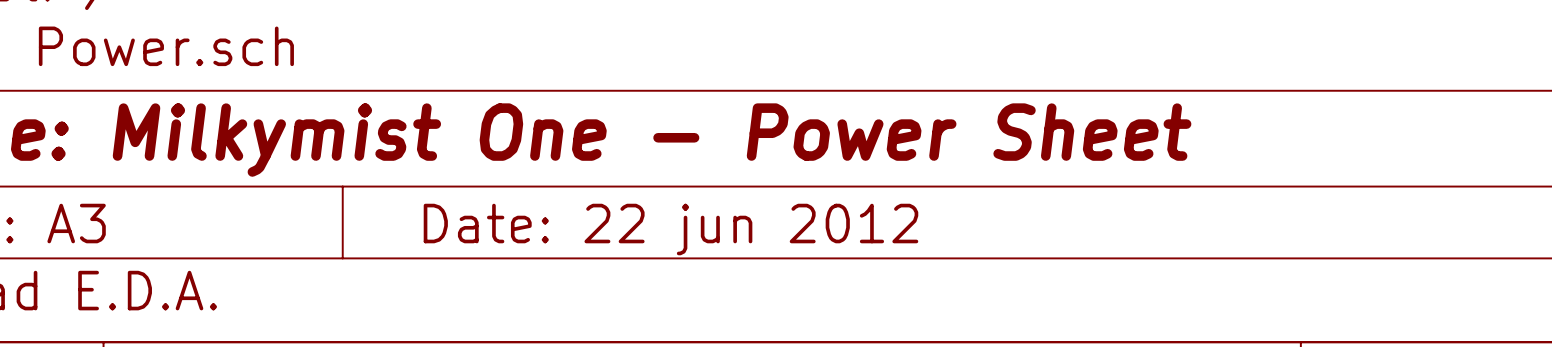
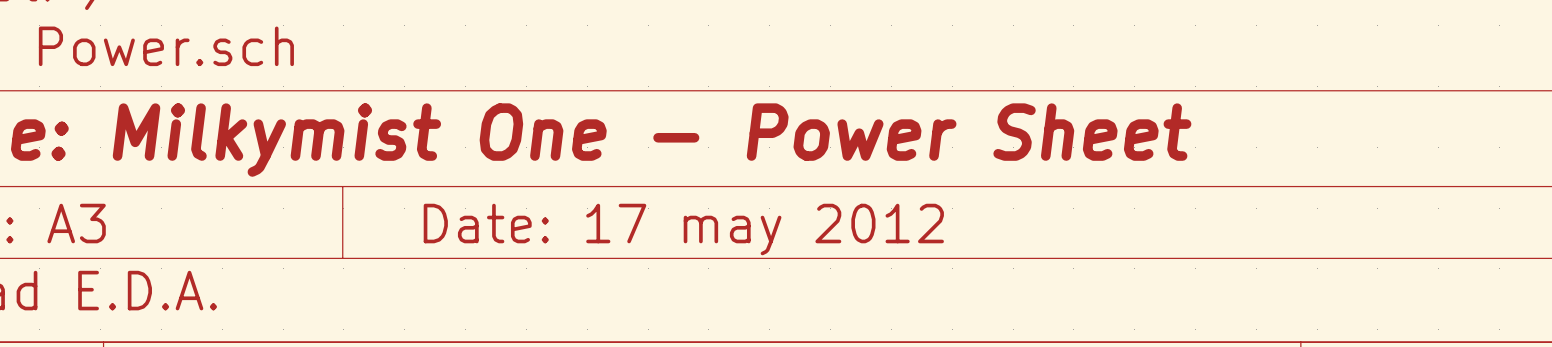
title block: Date: 22 jun 2012 (670, 229) -> Date: 17 may 2012 (683, 229)

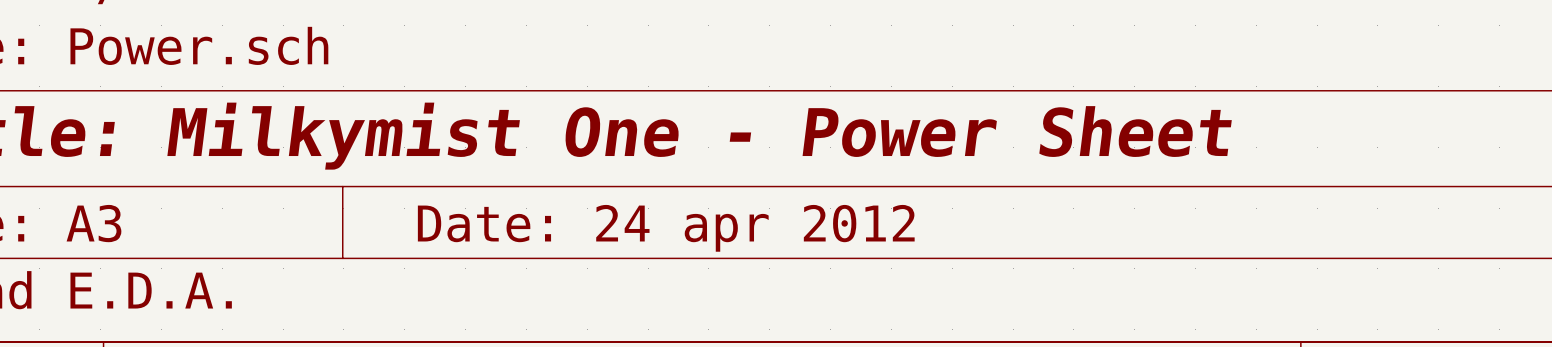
title block: Date: 17 may 2012 (683, 229) -> Date: 24 apr 2012 (666, 228)

